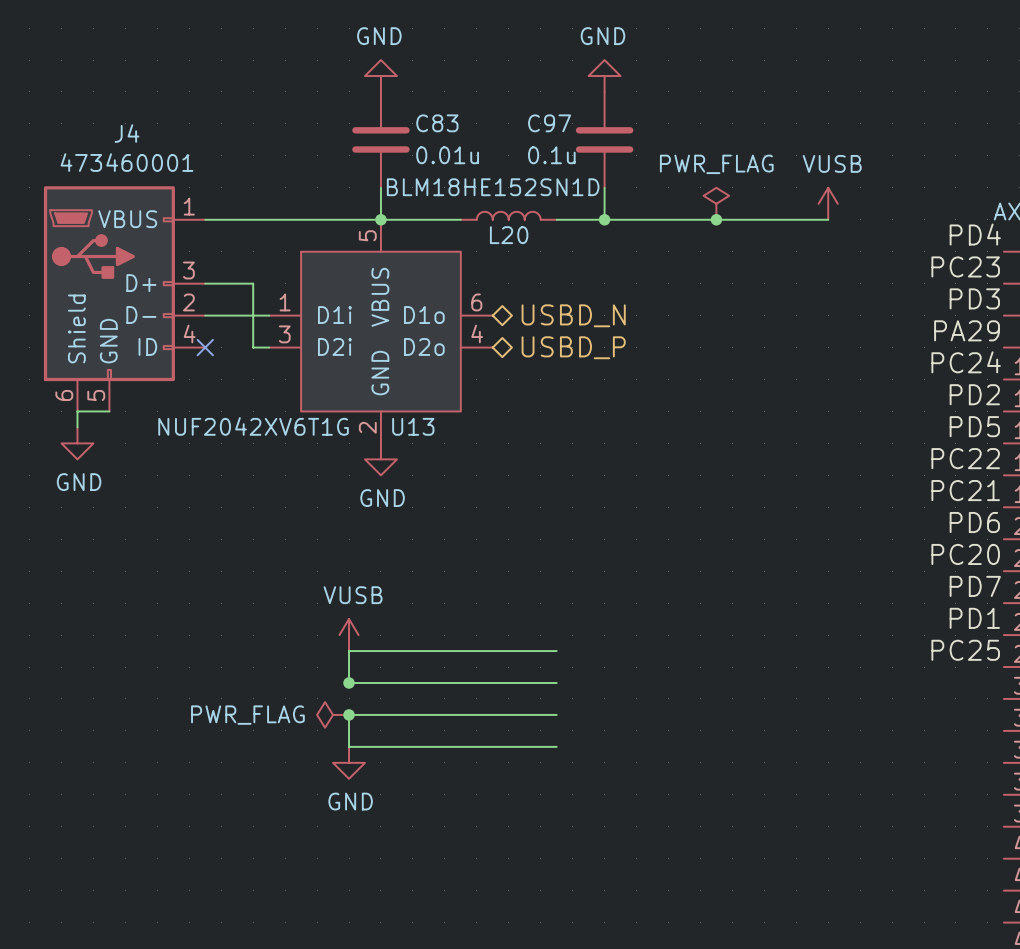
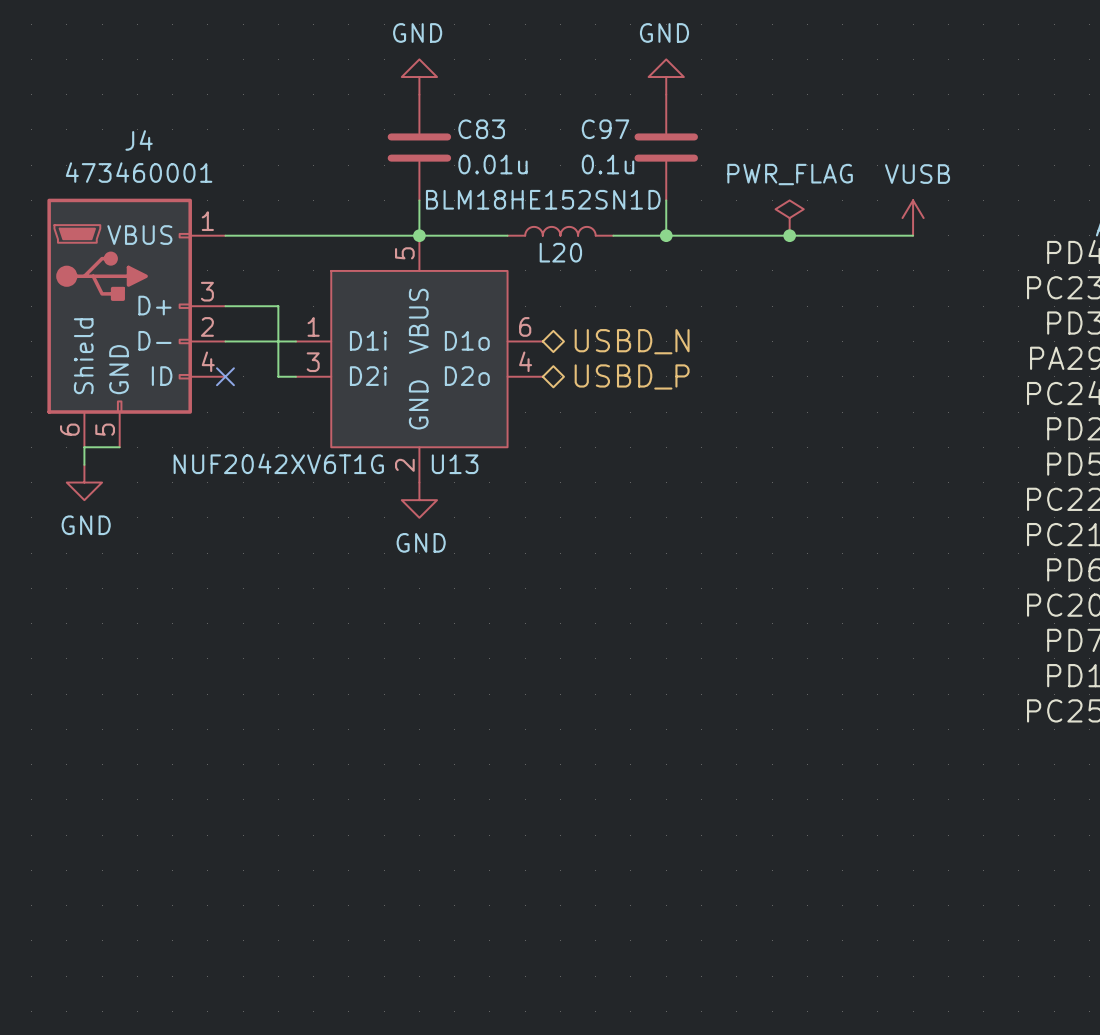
power symbol: VUSB (349, 635) -> none
wire: (556, 651) (349, 651) (349, 682) (556, 682) -> none
junction: (349, 682) -> none
power symbol: PWR_FLAG (333, 714) -> none
junction: (349, 714) -> none
wire: (556, 714) (349, 714) (349, 746) (556, 746) -> none
power symbol: GND (349, 762) -> none

